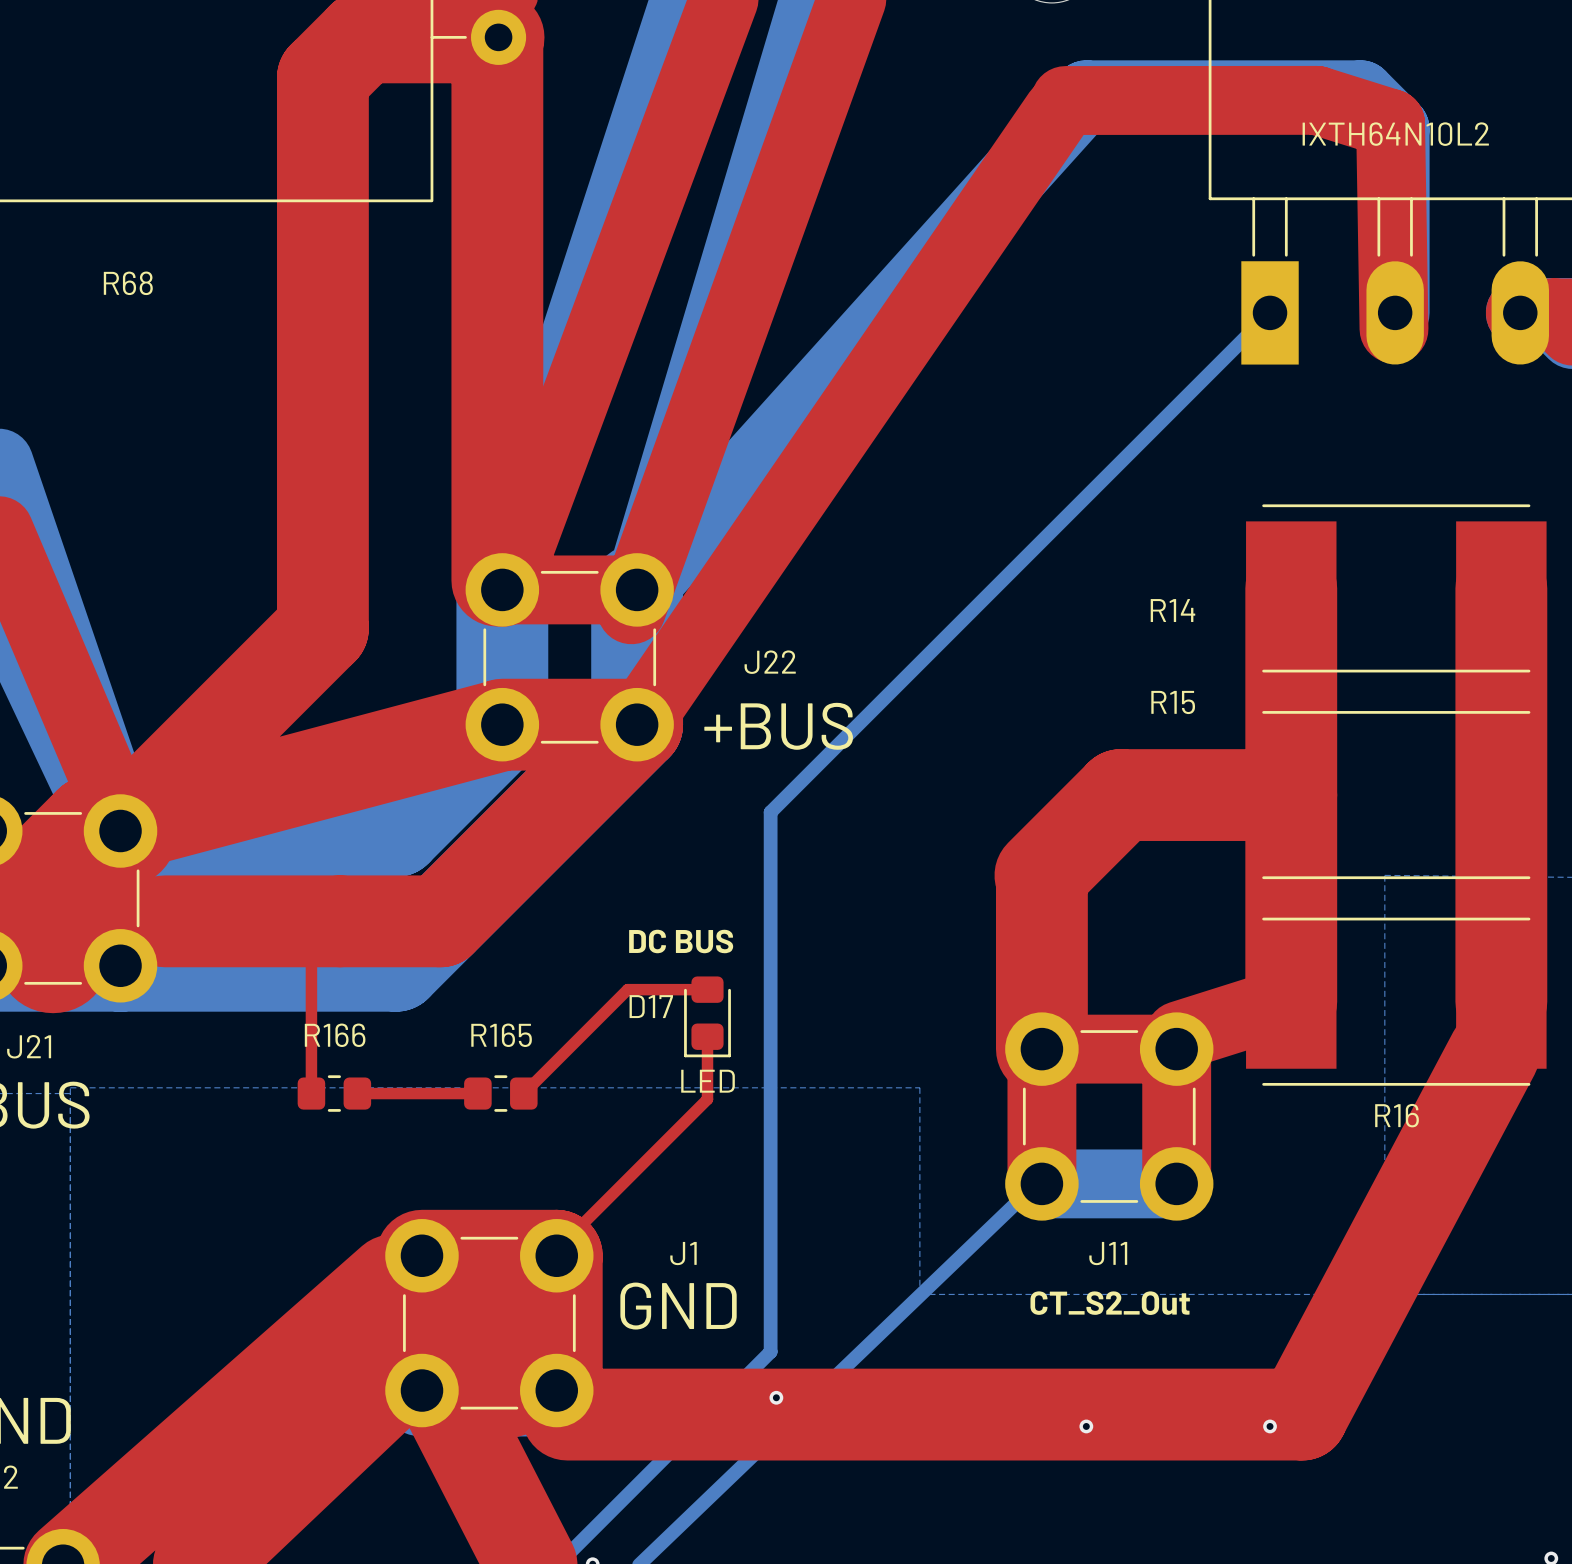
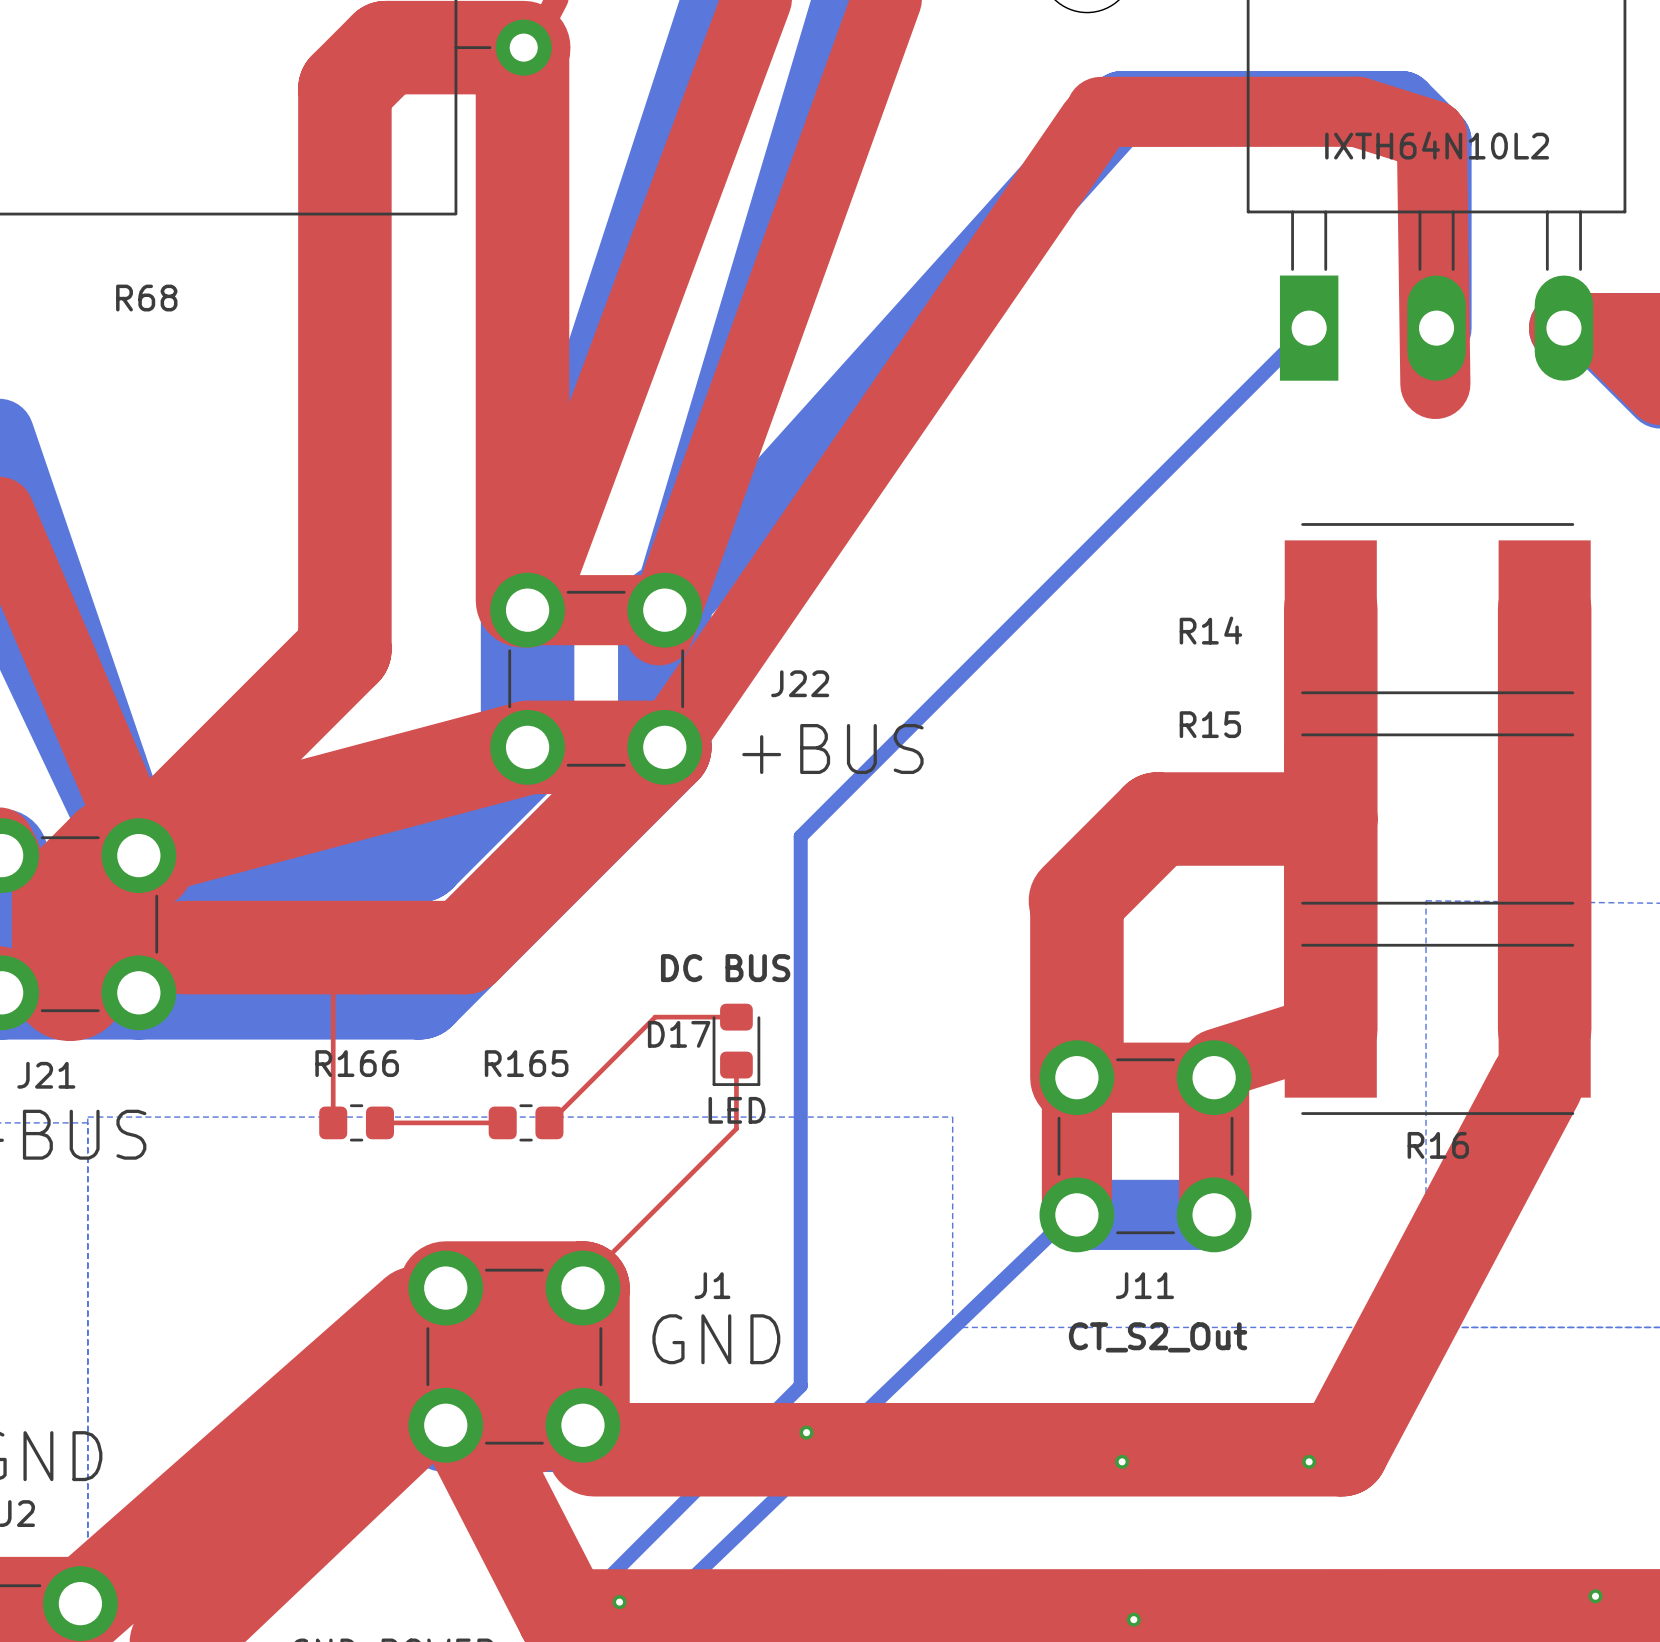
top track: (1390, 123) (1394, 328) -> (1431, 135) (1435, 384)
top track width: thick (311, 958) (311, 1093) -> thin (333, 984) (333, 1122)
top track width: thick (707, 989) (627, 989) (523, 1093) -> thin (736, 1017) (655, 1017) (549, 1122)
top track width: thick (707, 1036) (707, 1099) (556, 1250) -> thin (736, 1065) (736, 1128) (582, 1282)
top track width: thick (357, 1093) (477, 1093) -> thin (379, 1122) (502, 1122)

